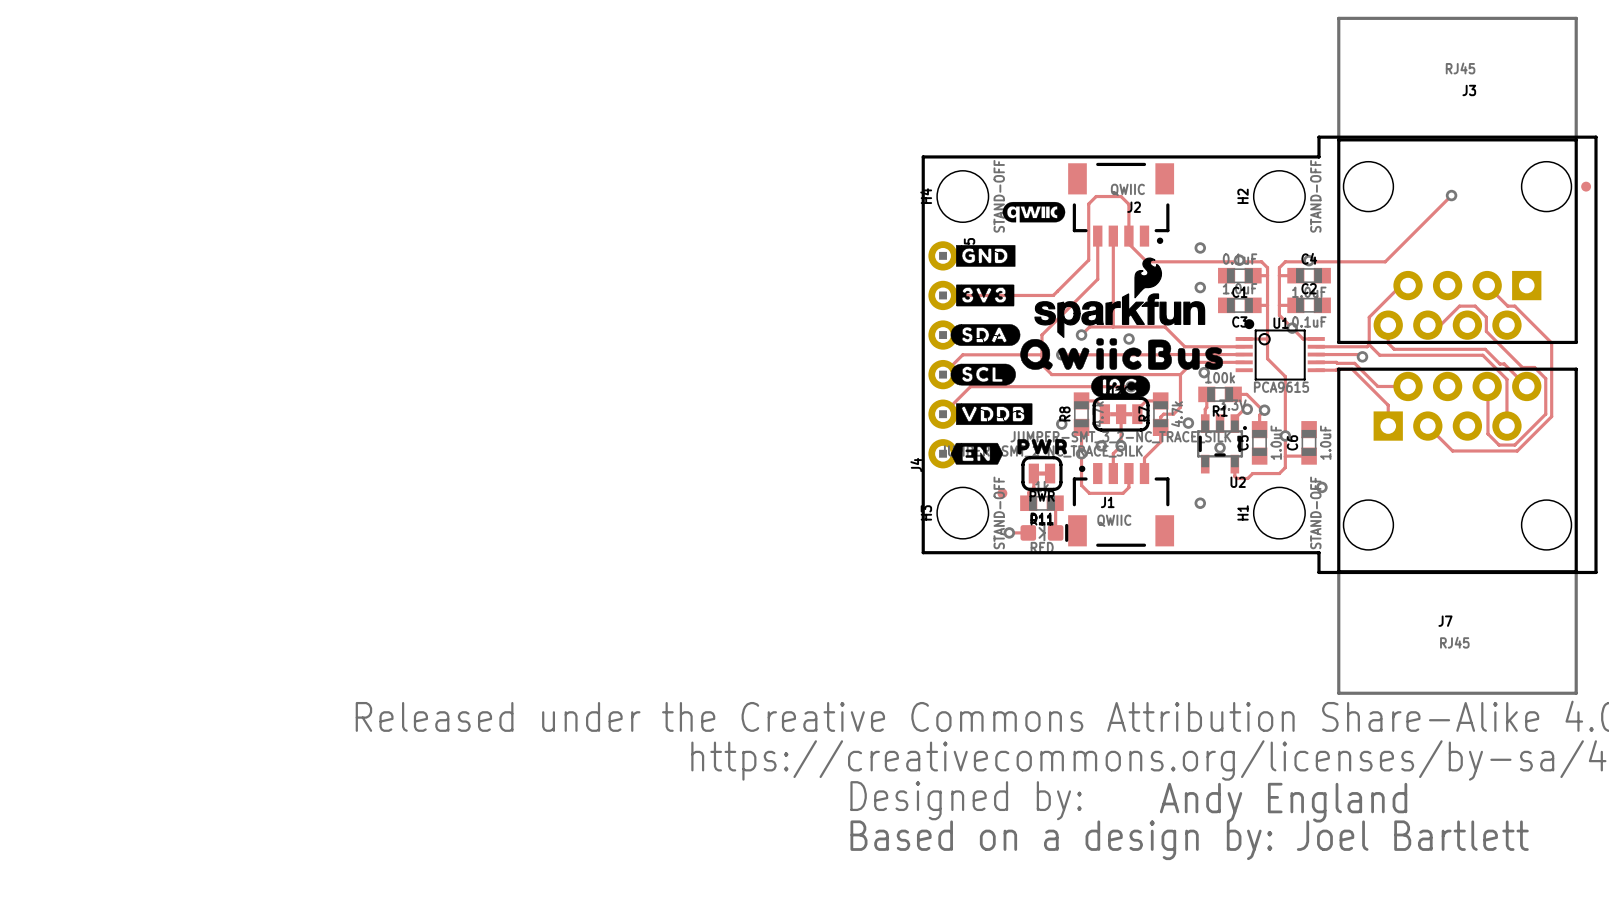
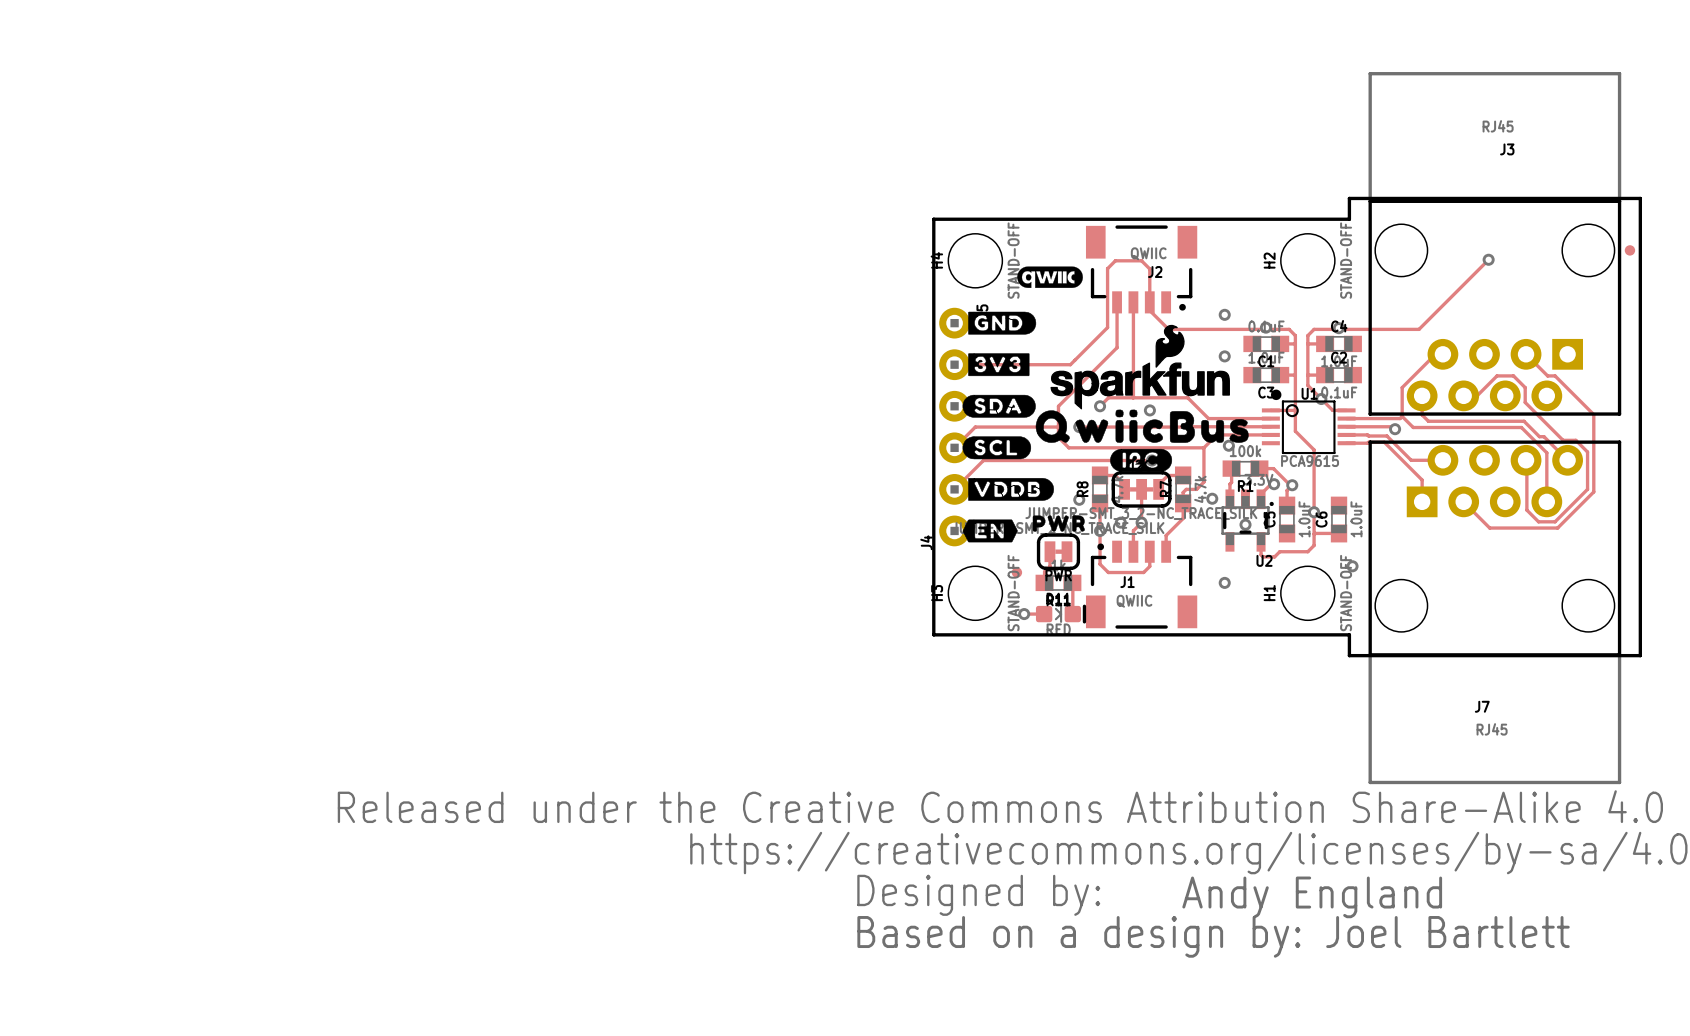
drawing shape: [956, 245, 1016, 267] -> [968, 311, 1037, 335]
drawing shape: [956, 403, 1033, 426] -> [968, 478, 1054, 501]

